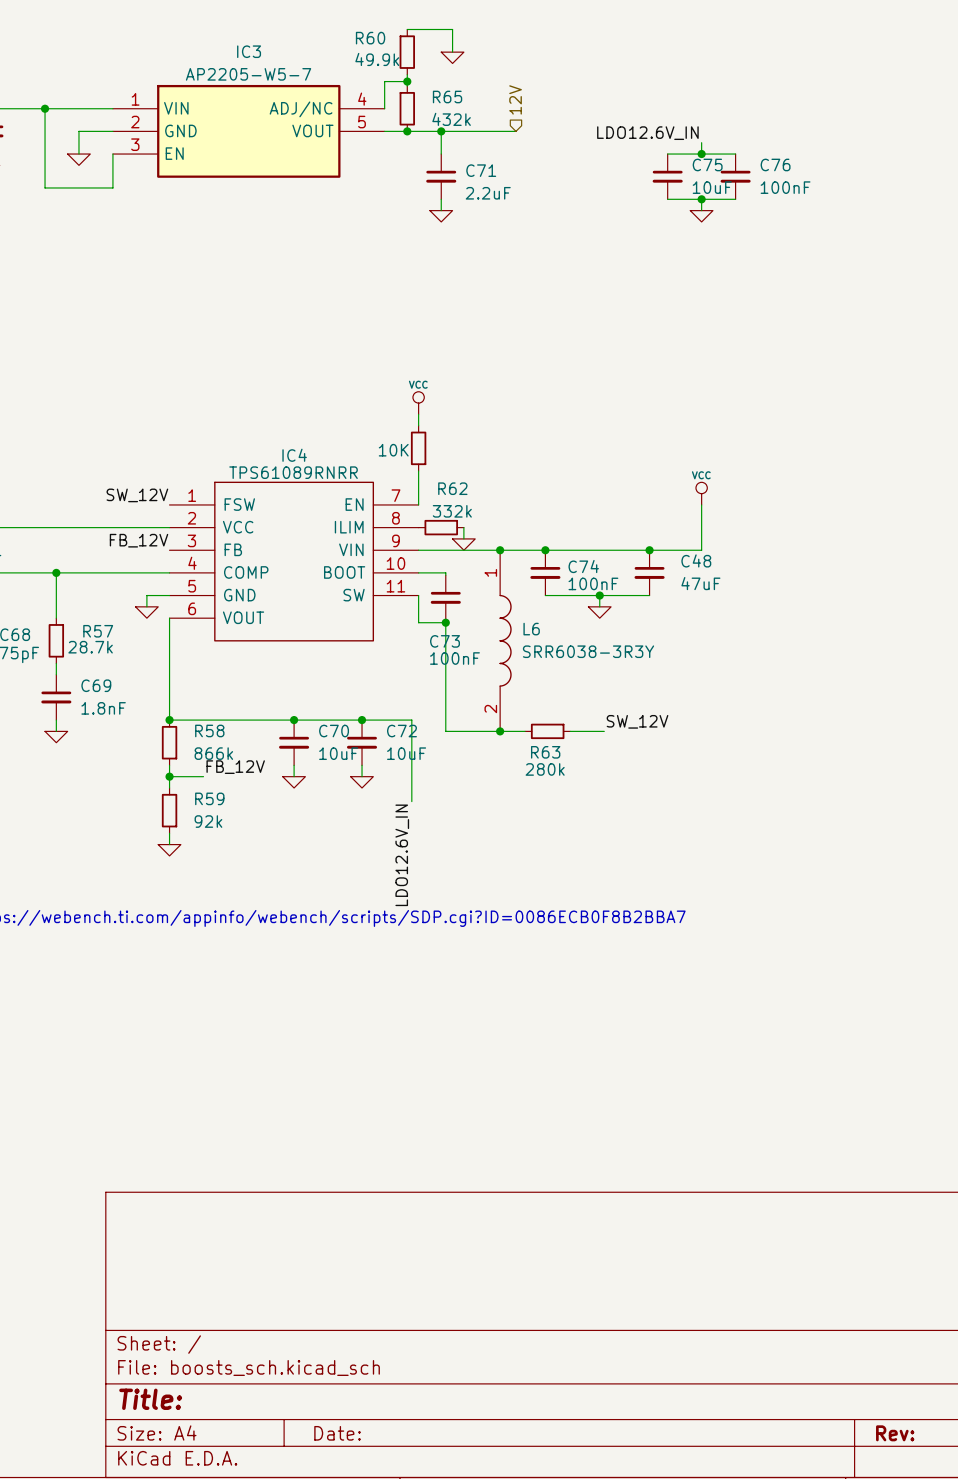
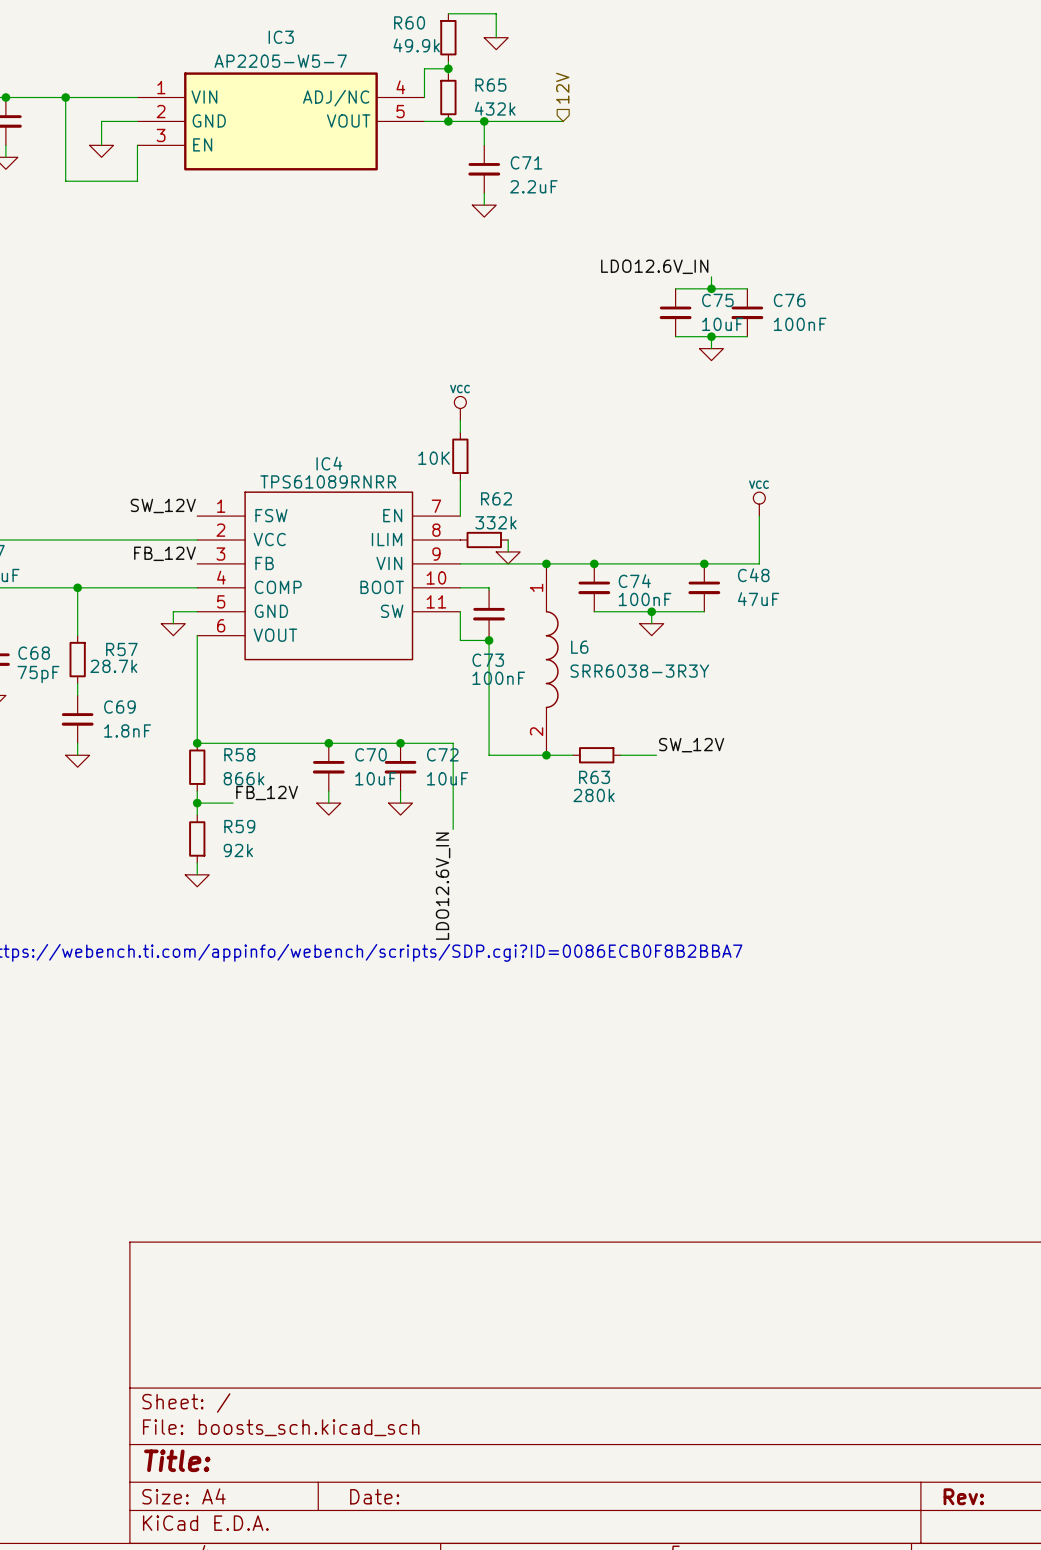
label position: LDO12.6V_IN (647, 133) -> LDO12.6V_IN (654, 266)
wire: (701, 142) (701, 154) -> (711, 336) (711, 348)
wire: (667, 154) (735, 154) -> (675, 336) (747, 336)
junction: (701, 154) -> none
C75 position: (667, 176) -> (675, 312)
C76 position: (735, 176) -> (747, 312)
wire: (667, 199) (735, 199) -> (675, 288) (747, 288)
wire: (701, 199) (701, 210) -> (711, 276) (711, 288)
junction: (701, 199) -> none
power symbol position: (701, 216) -> (711, 354)
junction: none -> (711, 288)
junction: none -> (711, 336)

